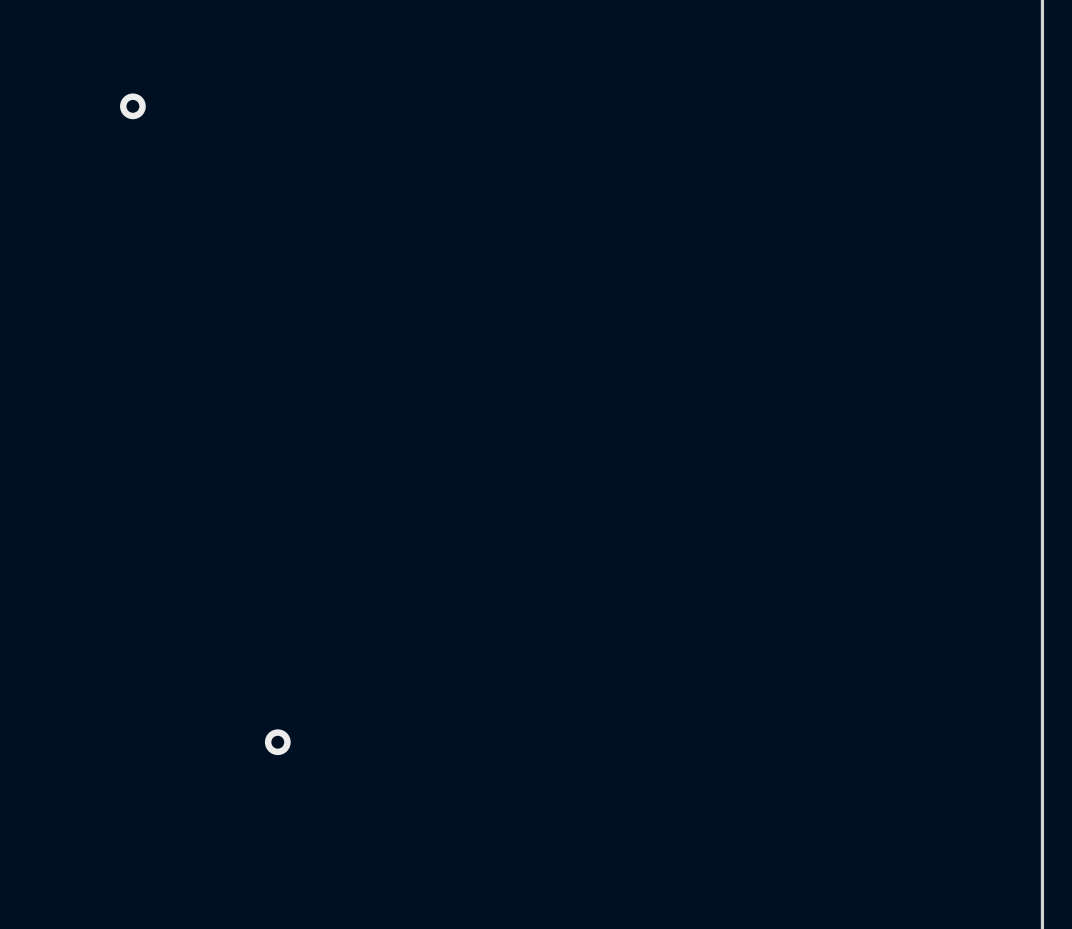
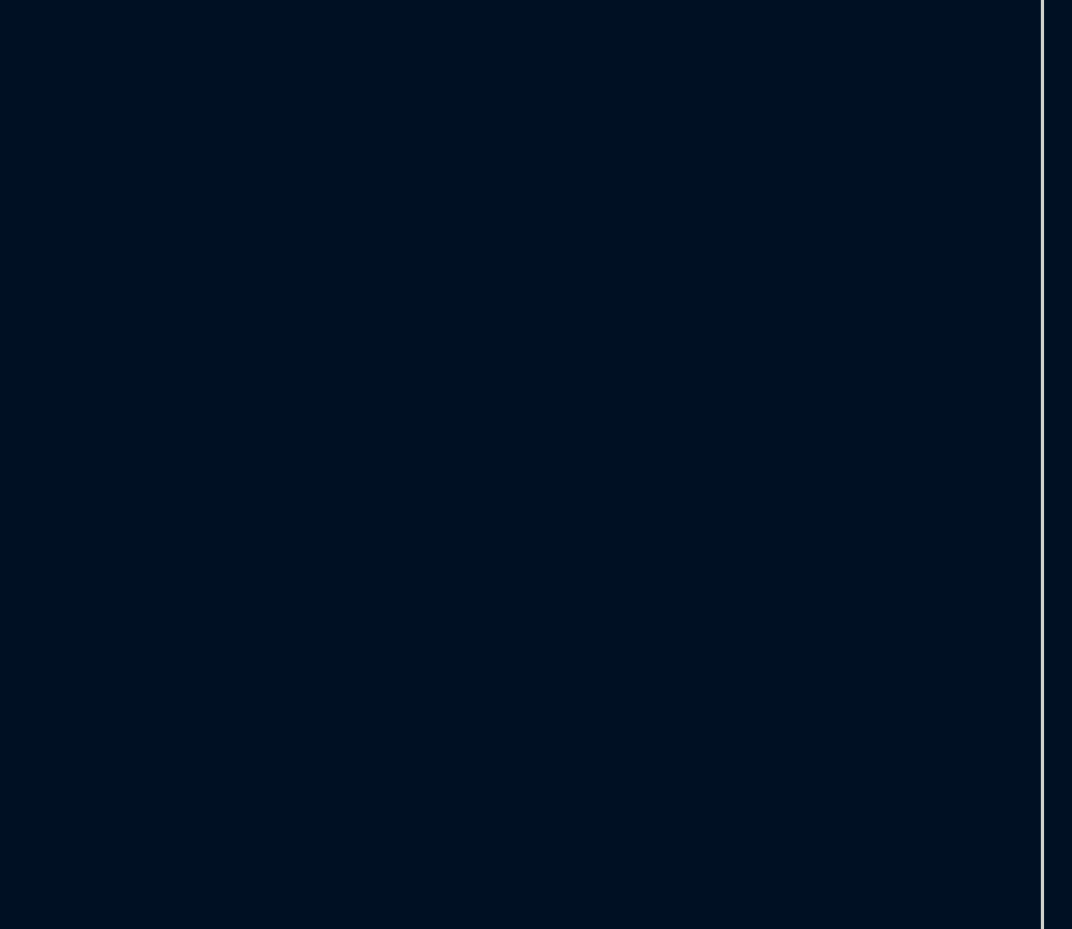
via: (132, 106) -> none
via: (277, 742) -> none

